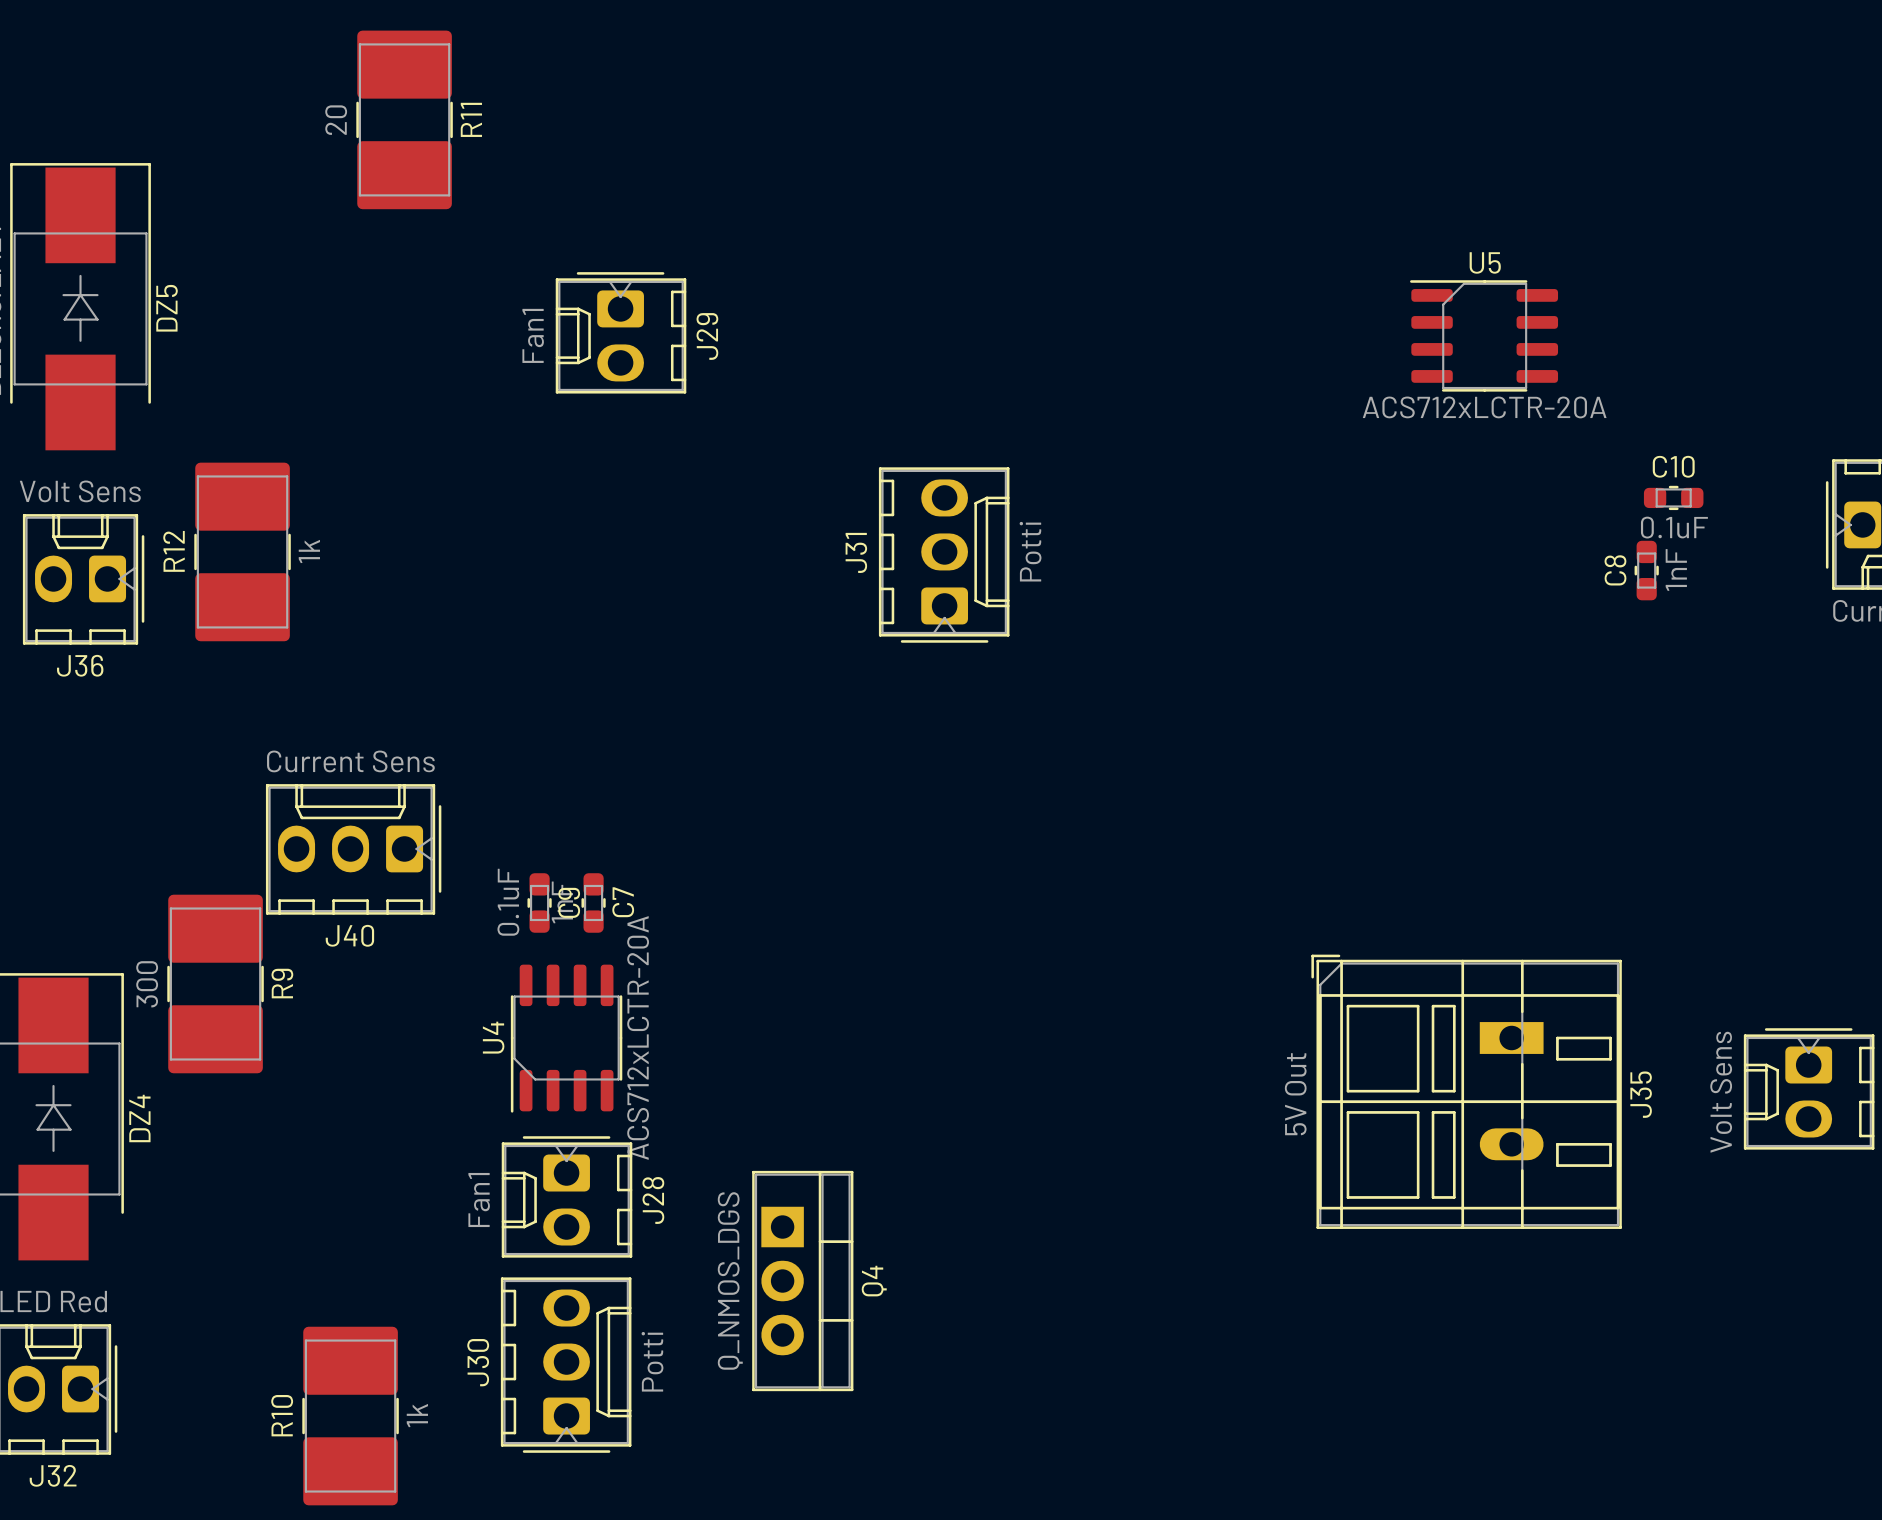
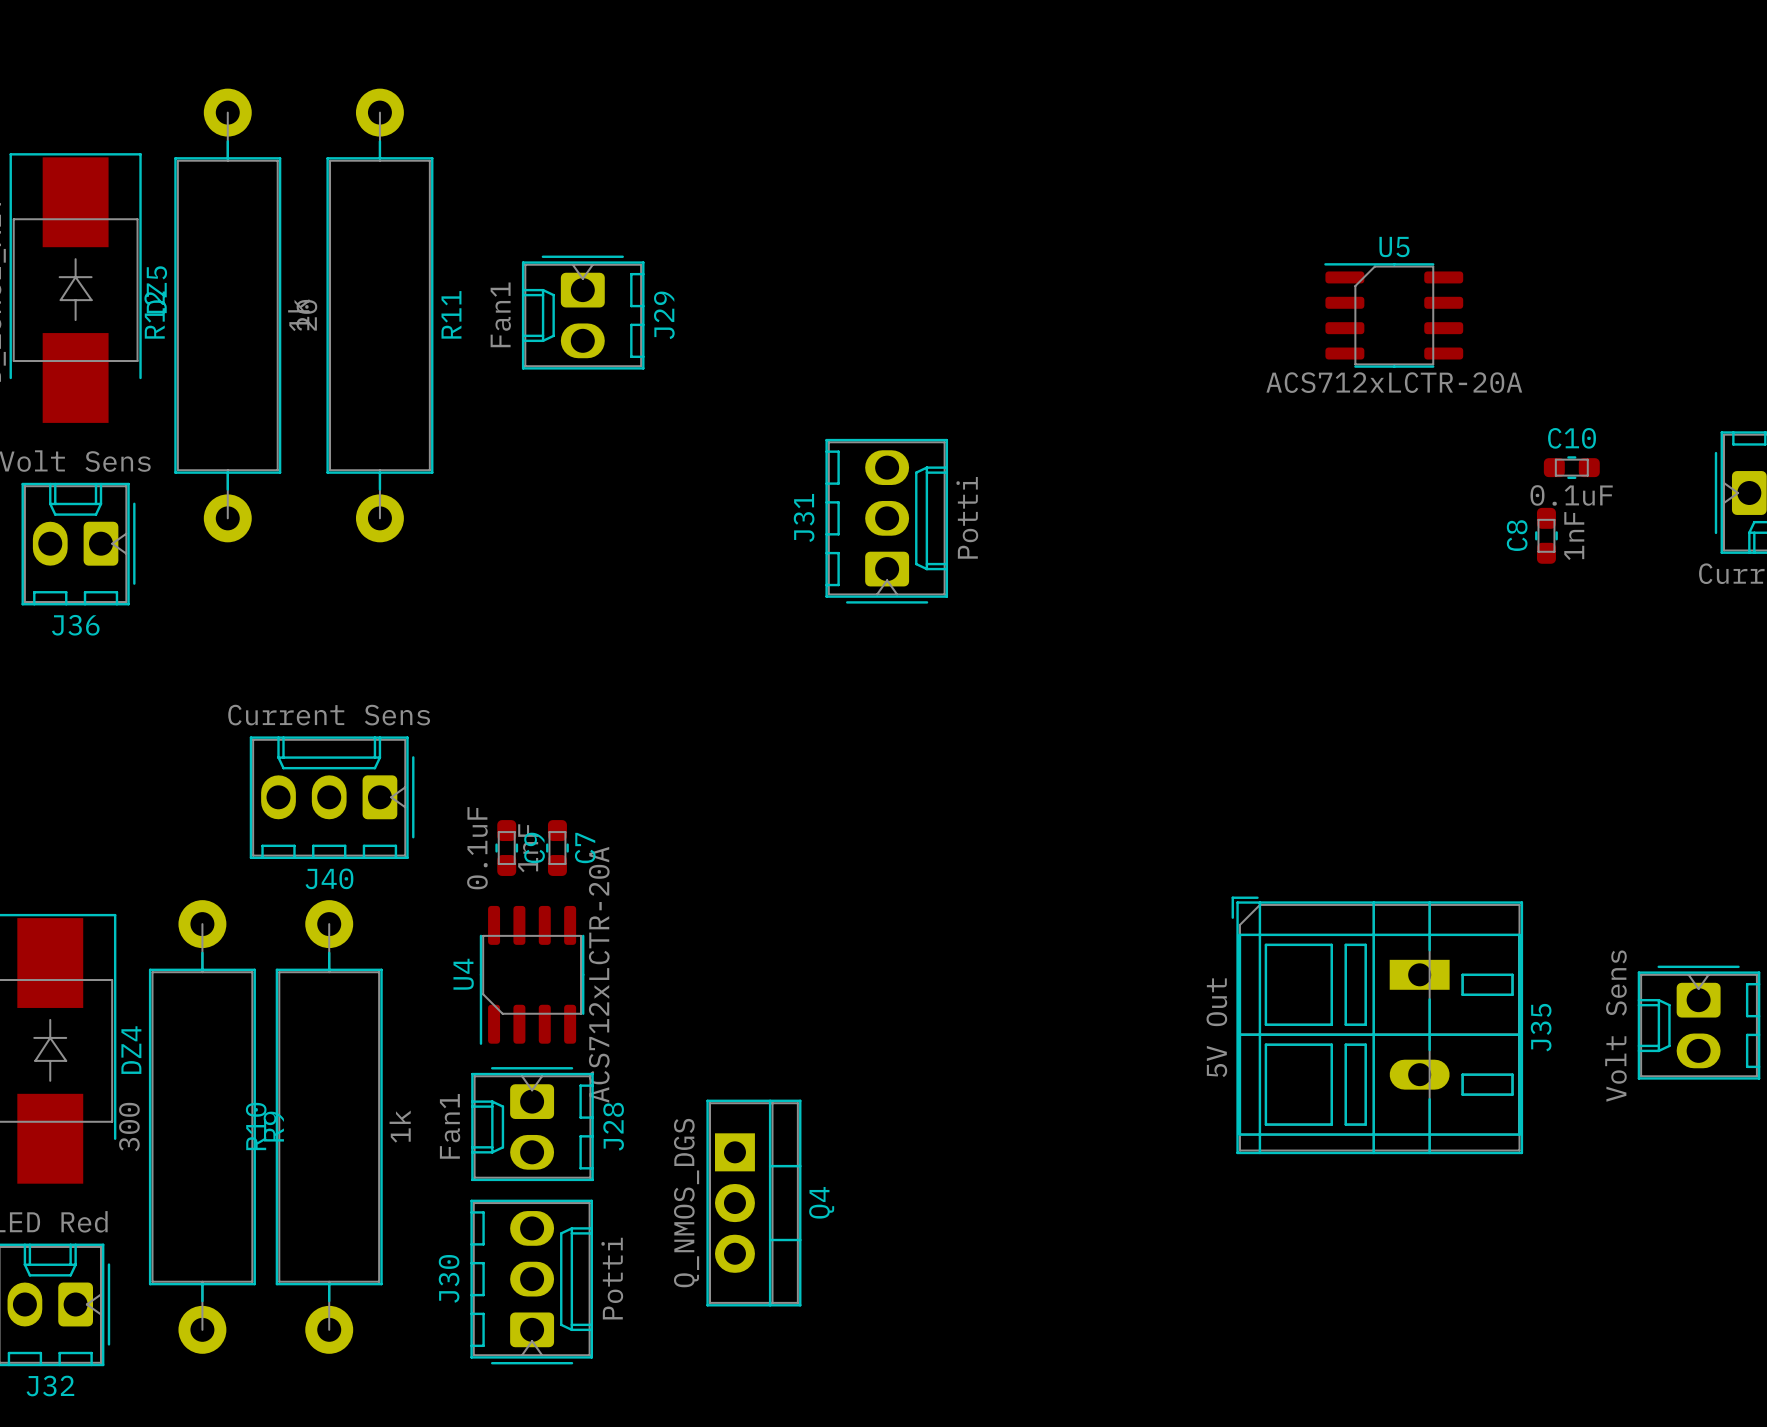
R11 footprint: [356, 30, 453, 210] -> [326, 88, 434, 543]
R12 footprint: [194, 462, 291, 642] -> [174, 88, 282, 543]
R9 footprint: [167, 894, 264, 1074] -> [148, 900, 256, 1354]
R10 footprint: [302, 1326, 399, 1506] -> [275, 900, 383, 1354]

